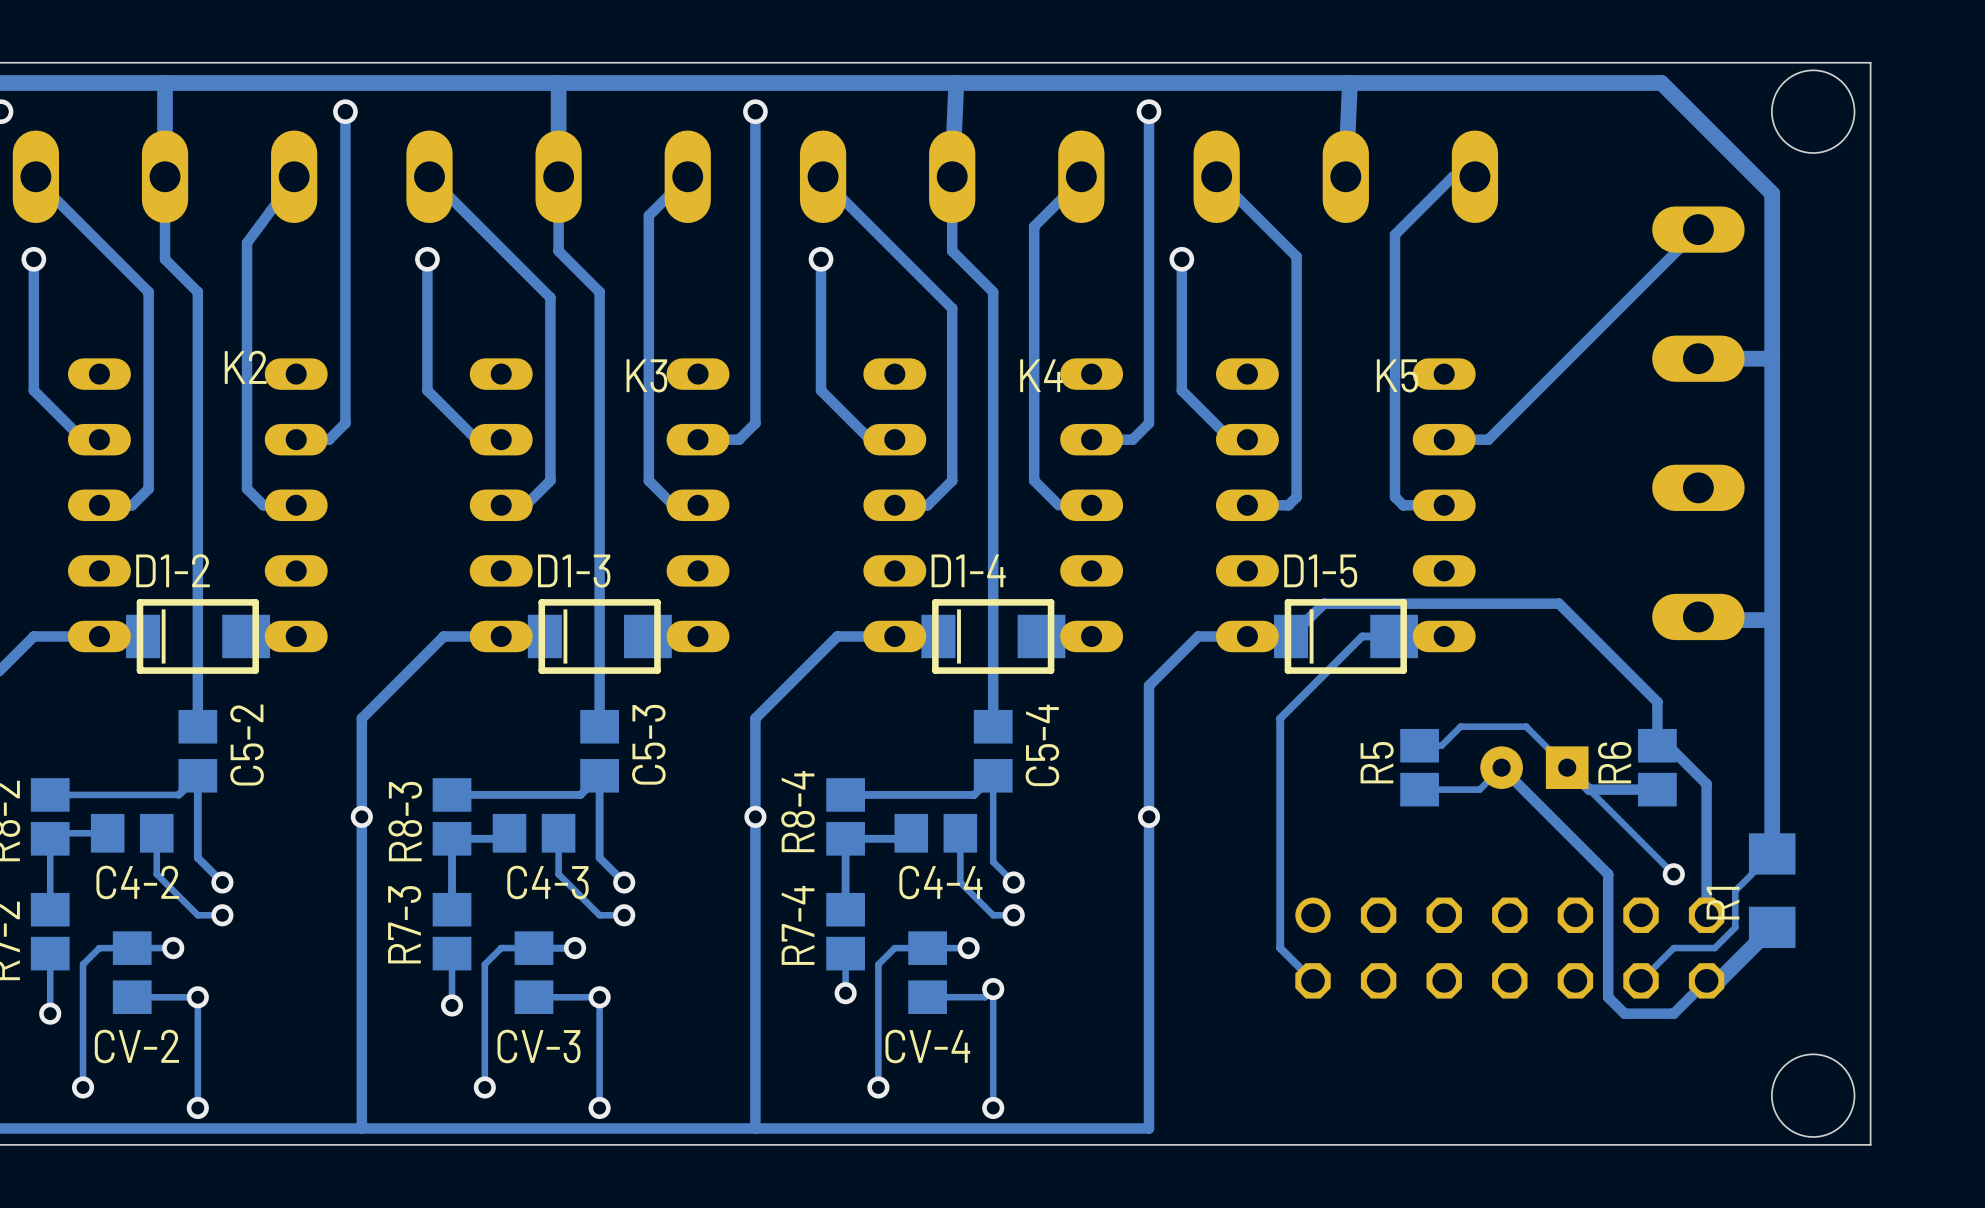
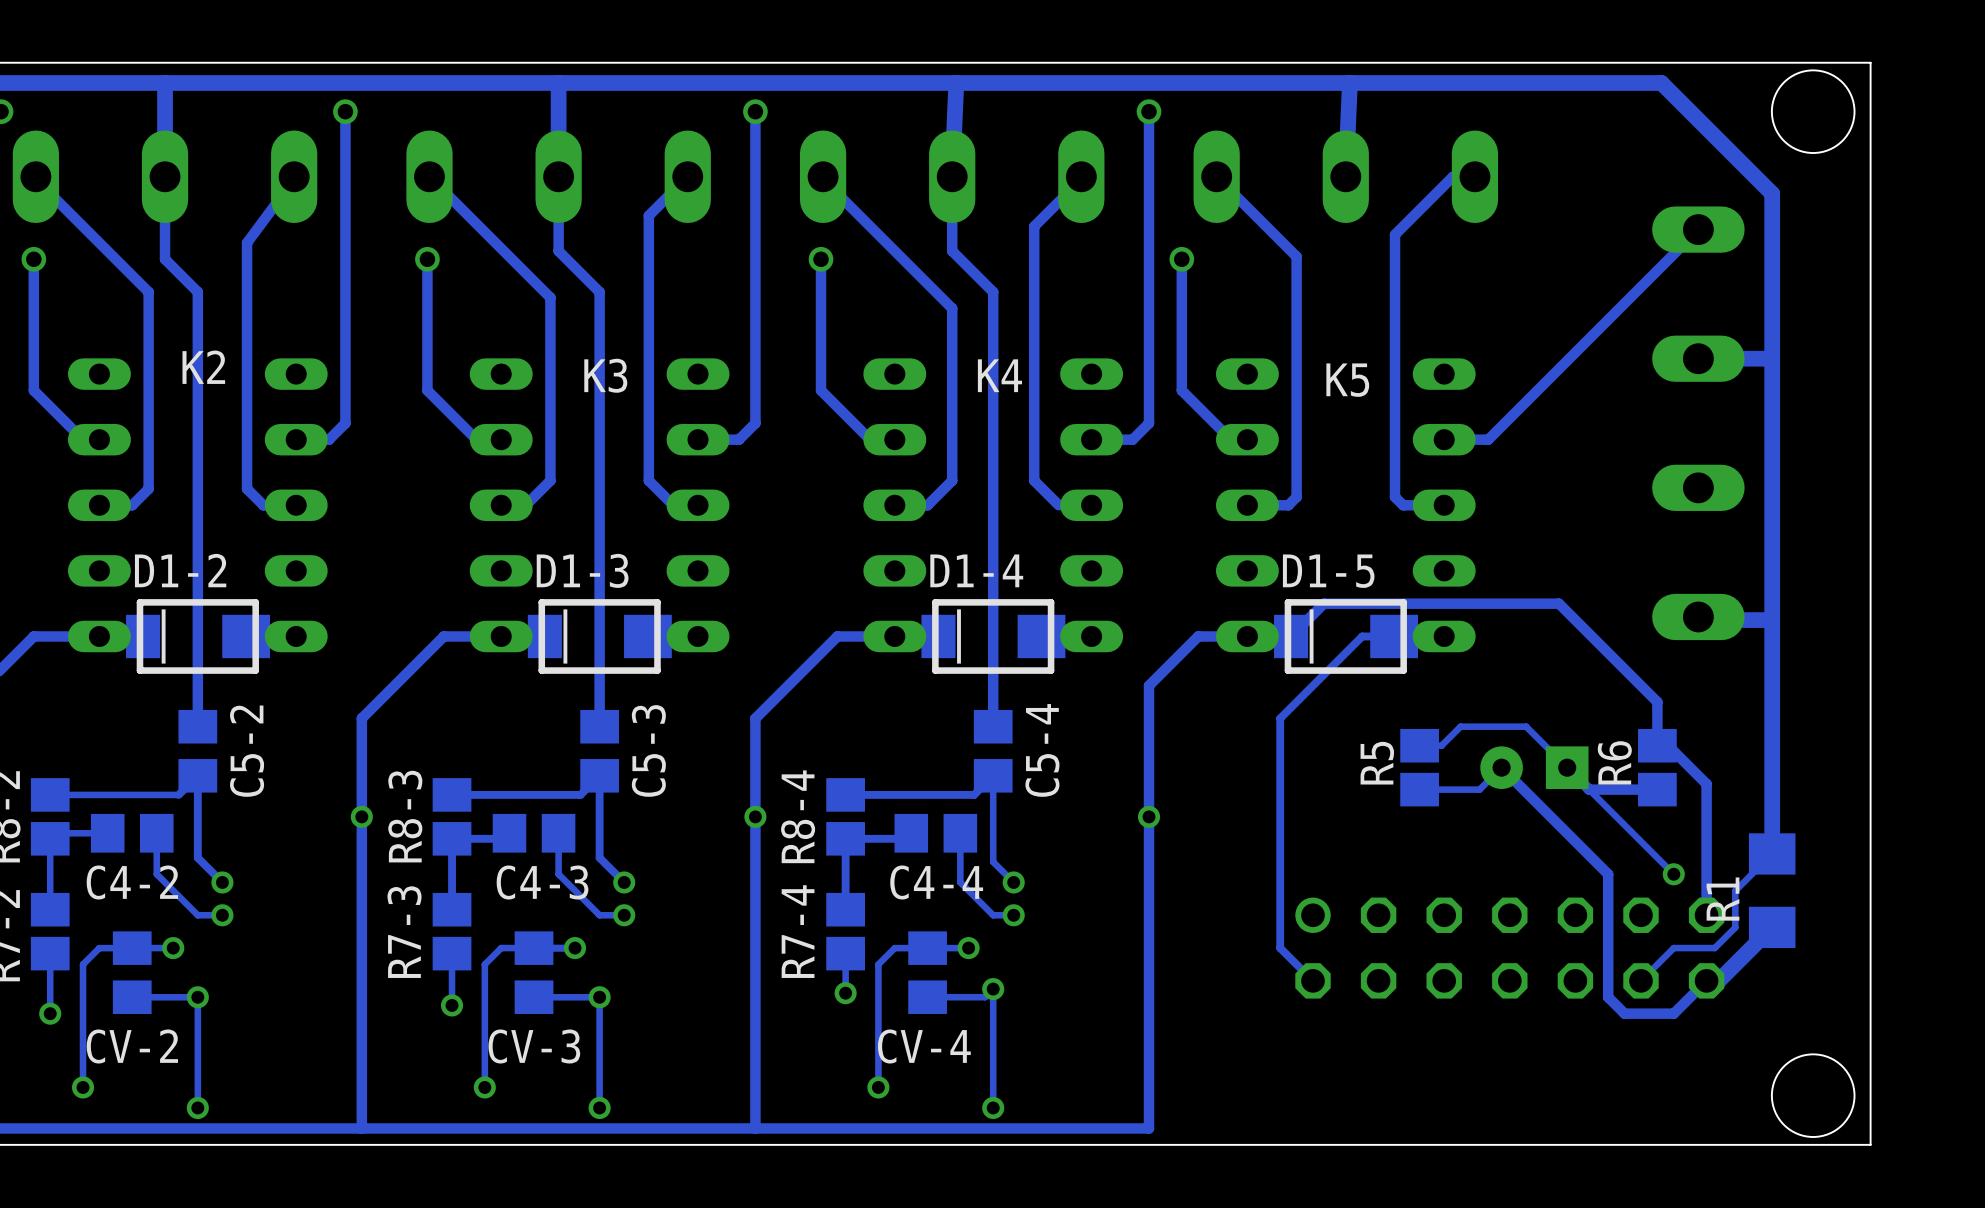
K2 name position: K2 (245, 367) -> K2 (203, 367)
K3 name position: K3 (646, 375) -> K3 (605, 375)
K4 name position: K4 (1041, 375) -> K4 (999, 375)
K5 name position: K5 (1397, 375) -> K5 (1347, 380)

